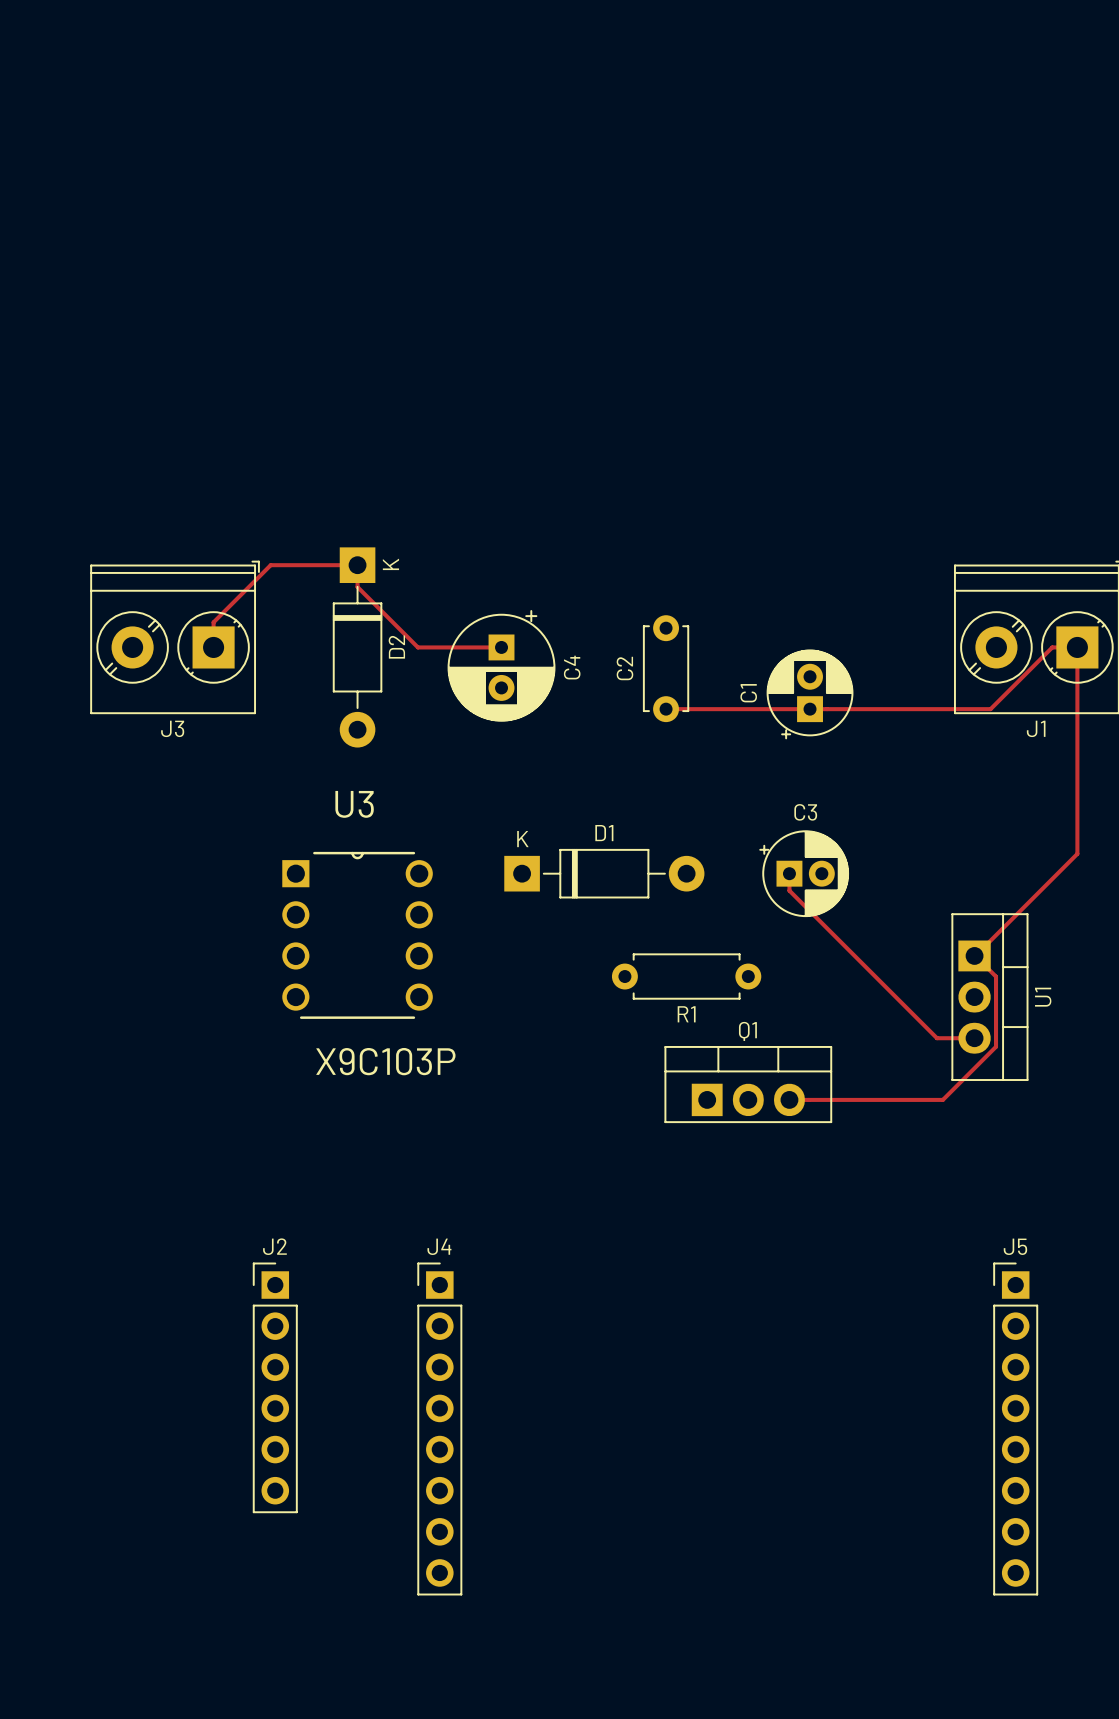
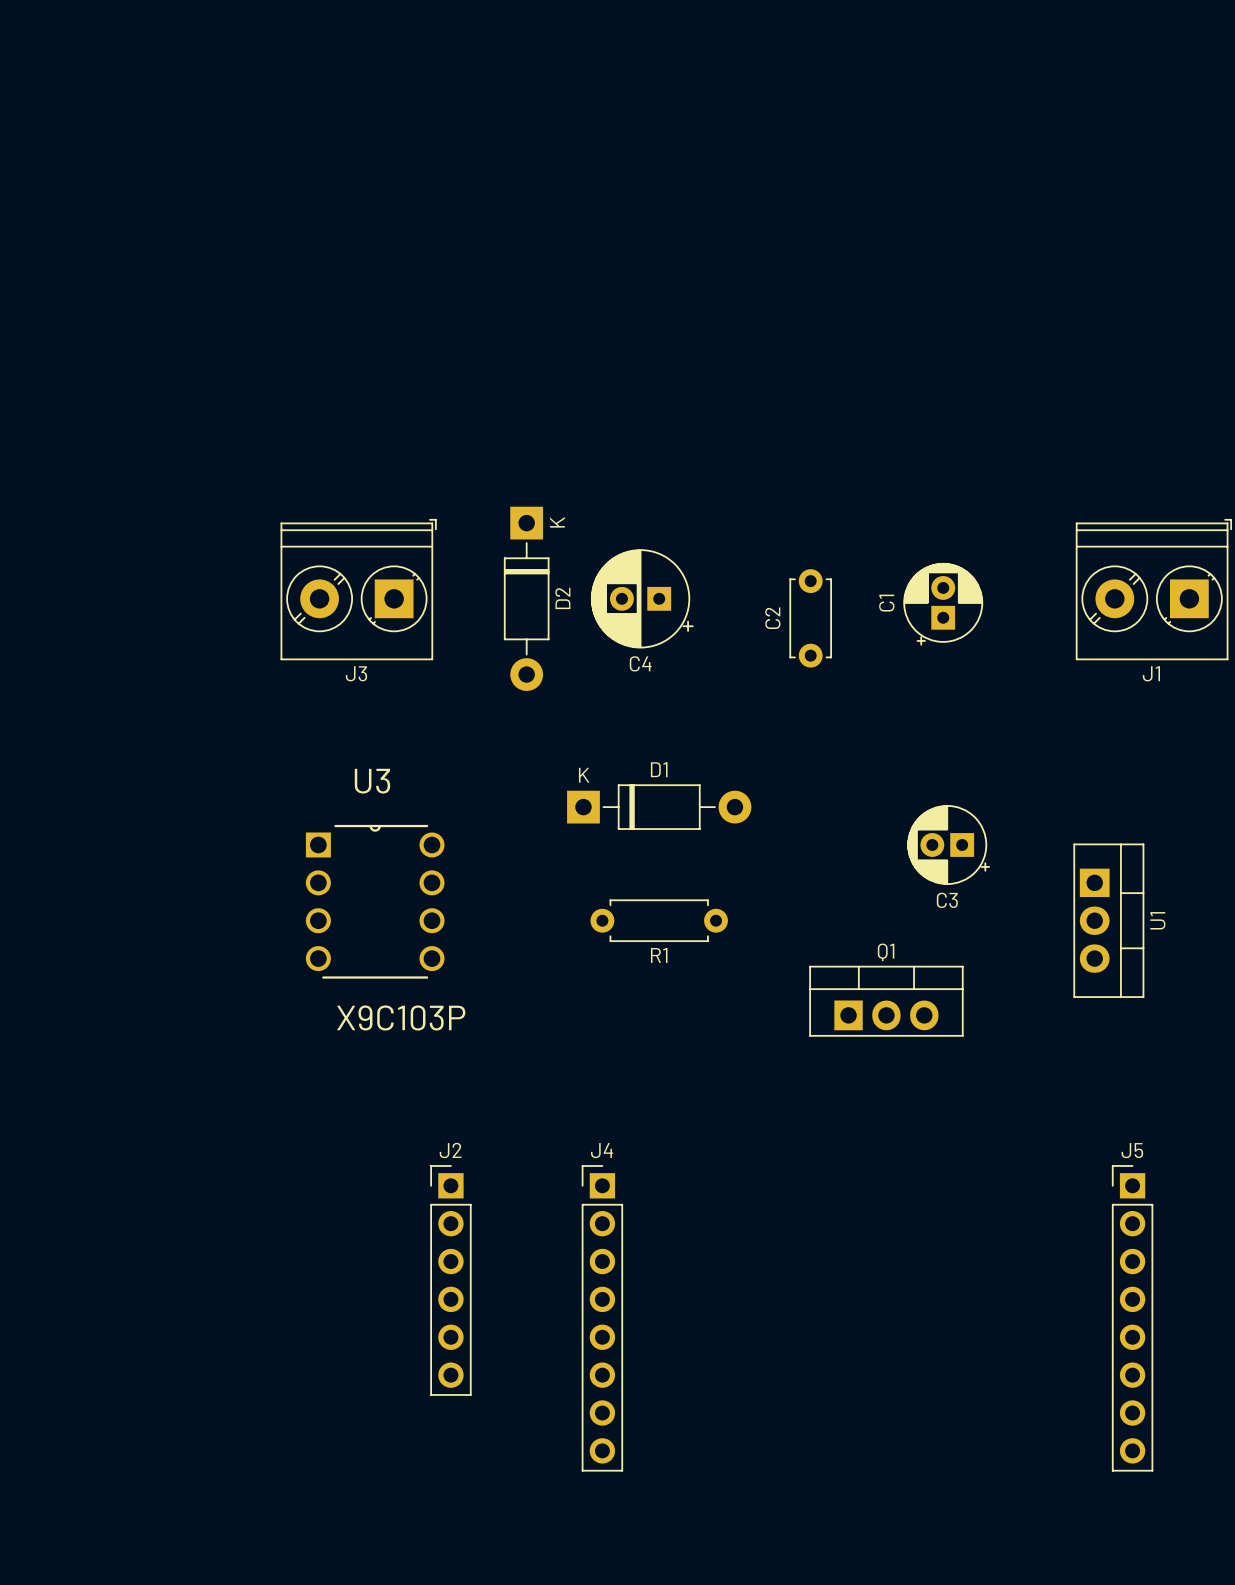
top track: (213, 647) (213, 622) (270, 565) (357, 565) (357, 587) (417, 647) (501, 647) -> none
C4 rotation: 0° (501, 665) -> 90° clockwise (642, 598)
C1 position: (810, 694) -> (943, 604)
top track: (666, 709) (990, 709) (1052, 647) (1077, 647) (1077, 853) (975, 955) -> none
D1 position: (604, 873) -> (659, 807)
top track: (789, 873) (789, 890) (936, 1038) (974, 1038) -> none
C3 rotation: 0° (804, 873) -> 180° (948, 844)
U3 position: (357, 935) -> (375, 901)
top track: (975, 955) (996, 976) (996, 1046) (942, 1099) (789, 1099) -> none
R1 position: (686, 976) -> (659, 920)

